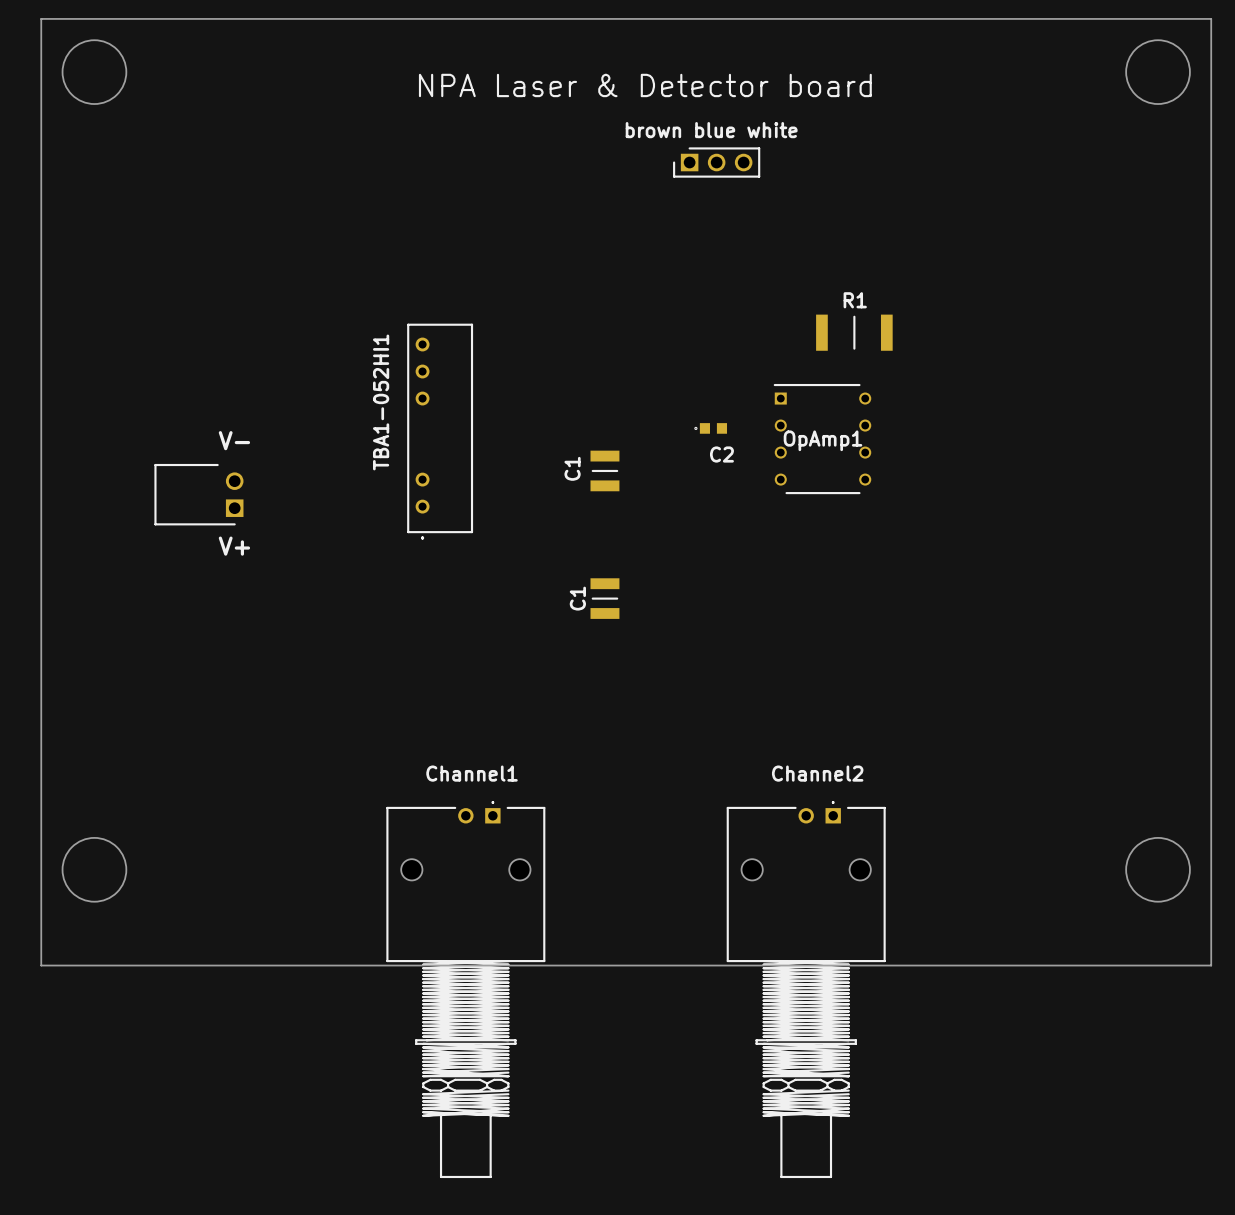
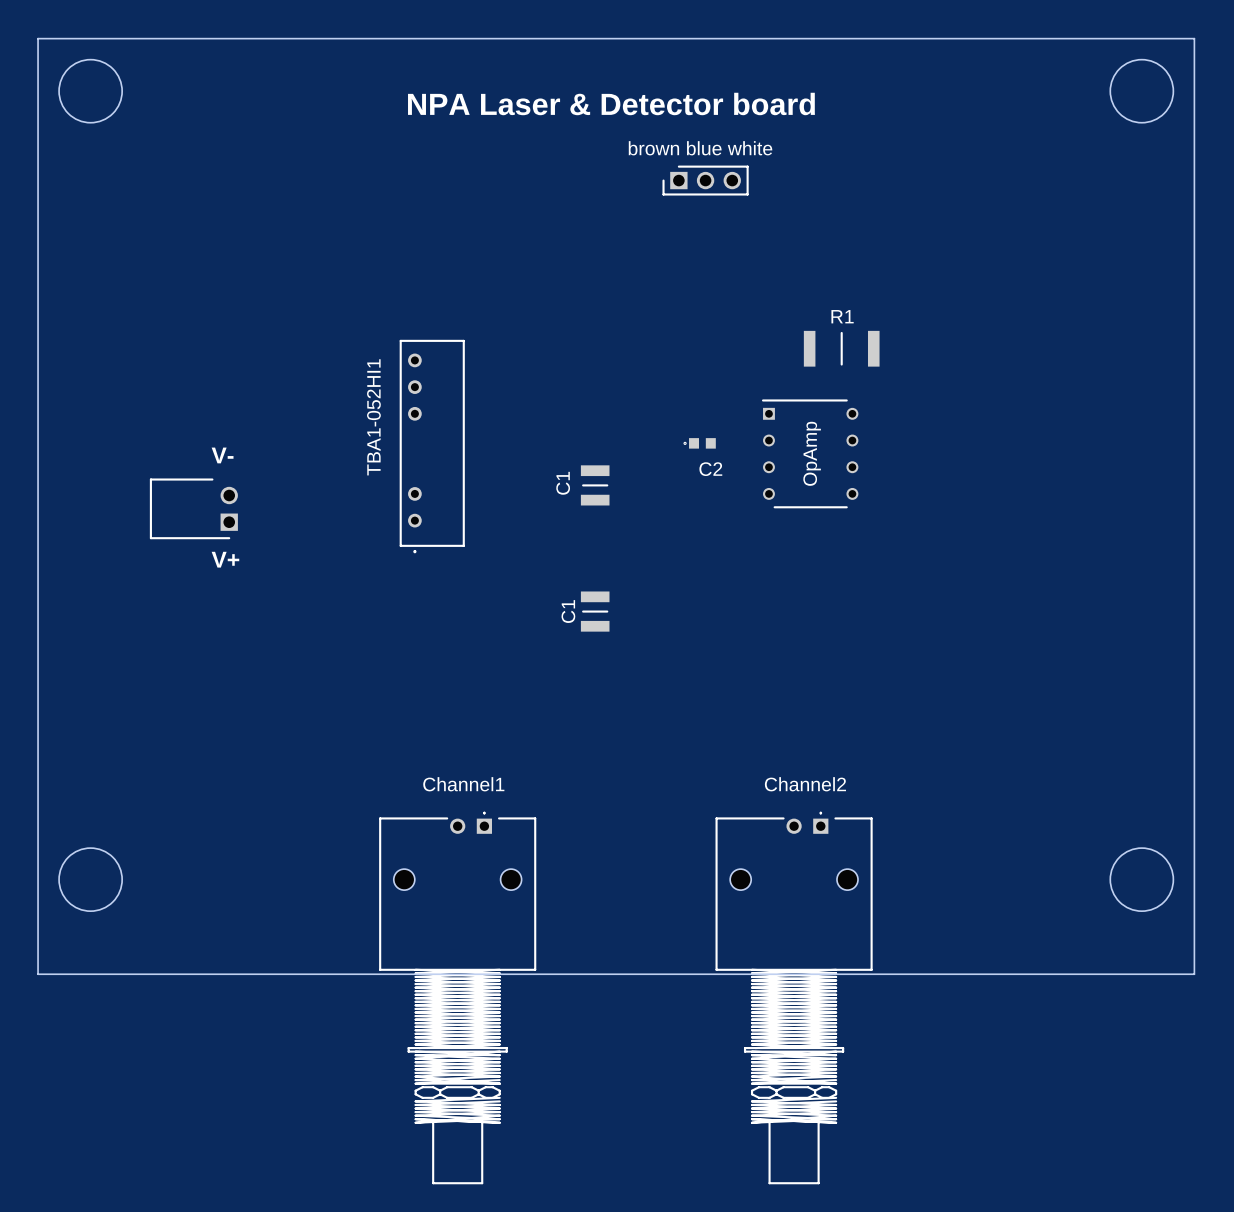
OpAmp1 name: OpAmp1 (823, 440) -> OpAmp (812, 453)

